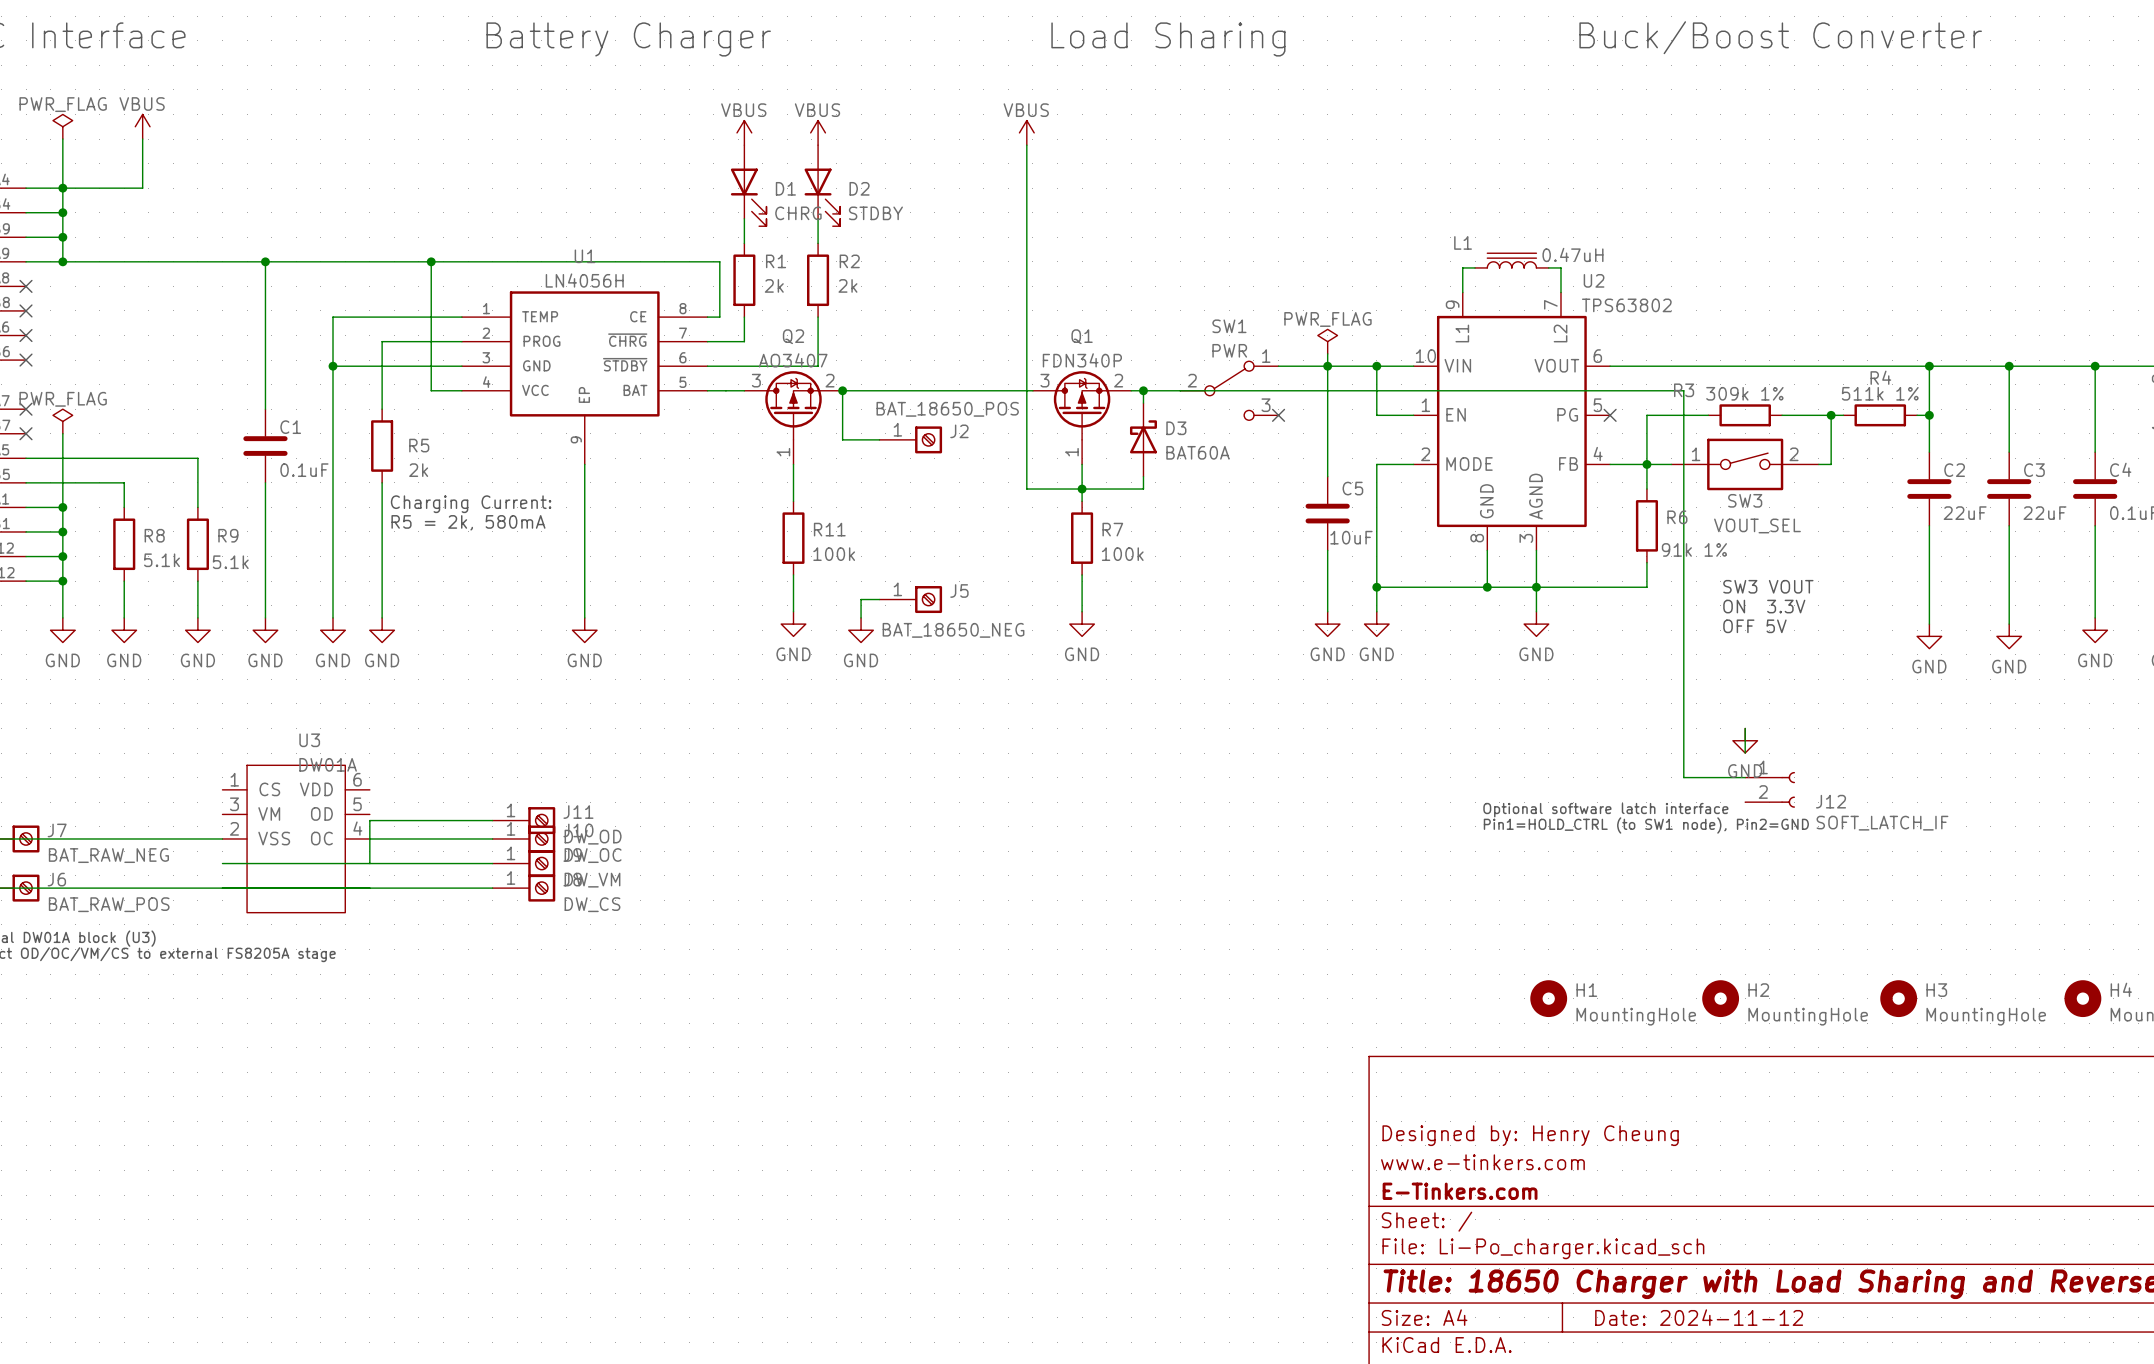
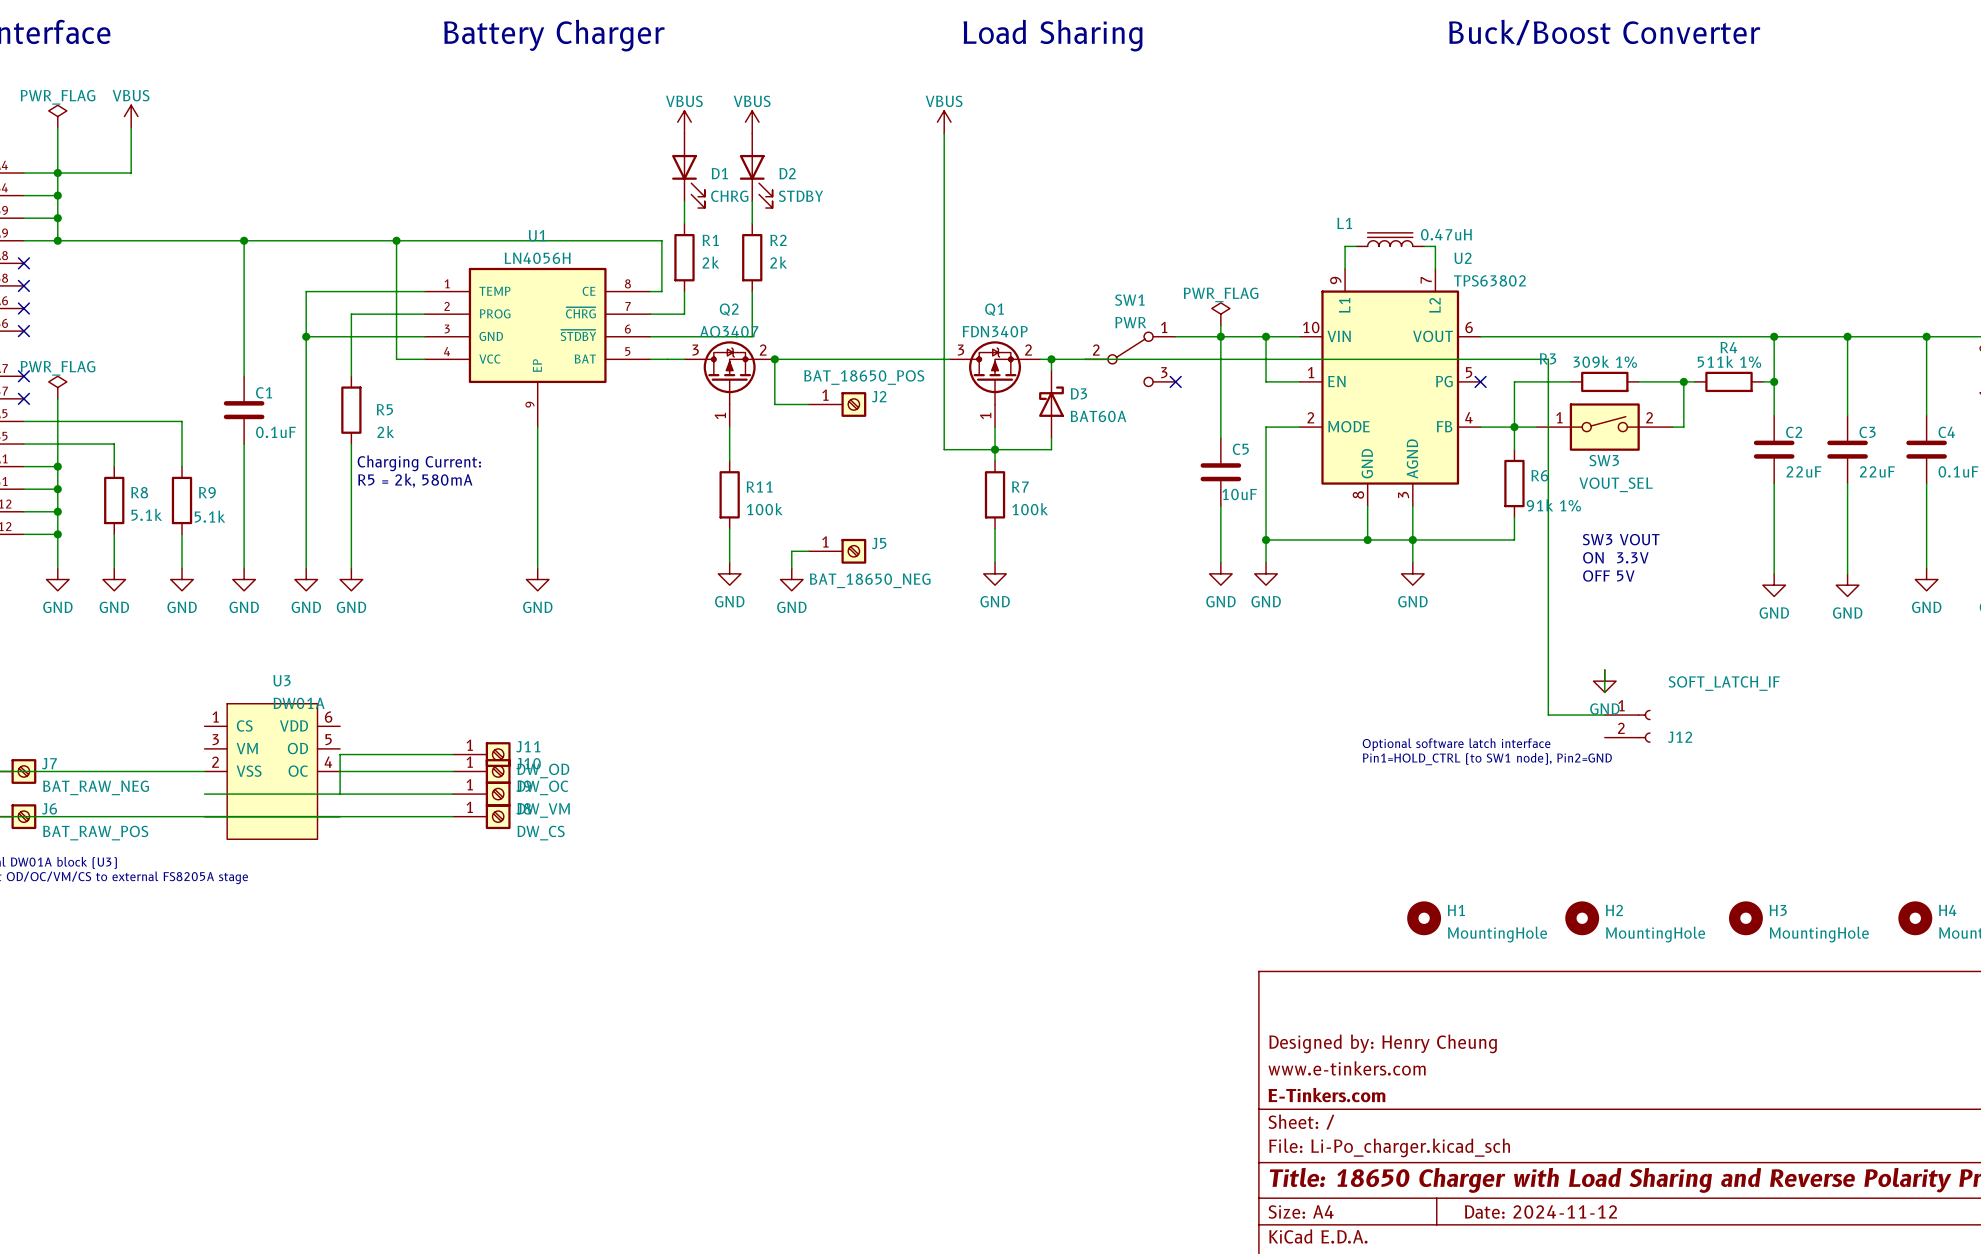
J12 value position: SOFT_LATCH_IF (1882, 823) -> SOFT_LATCH_IF (1724, 683)

